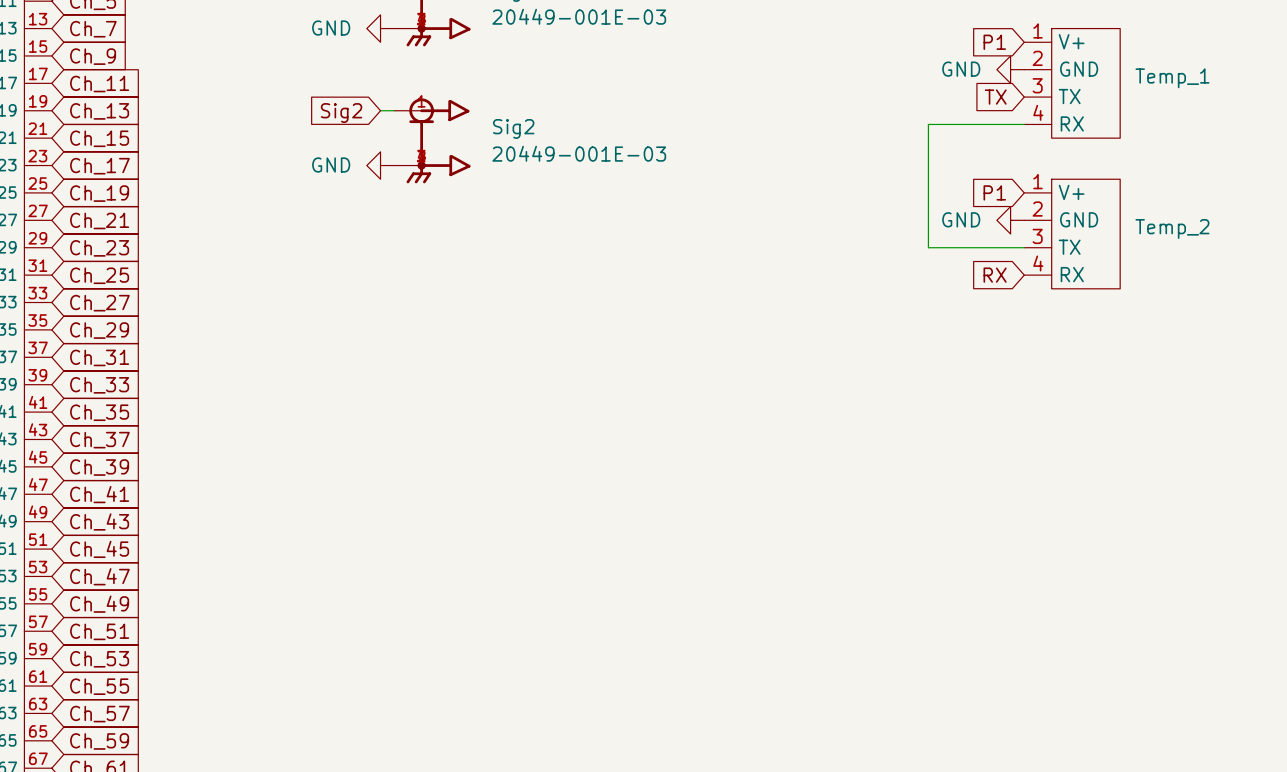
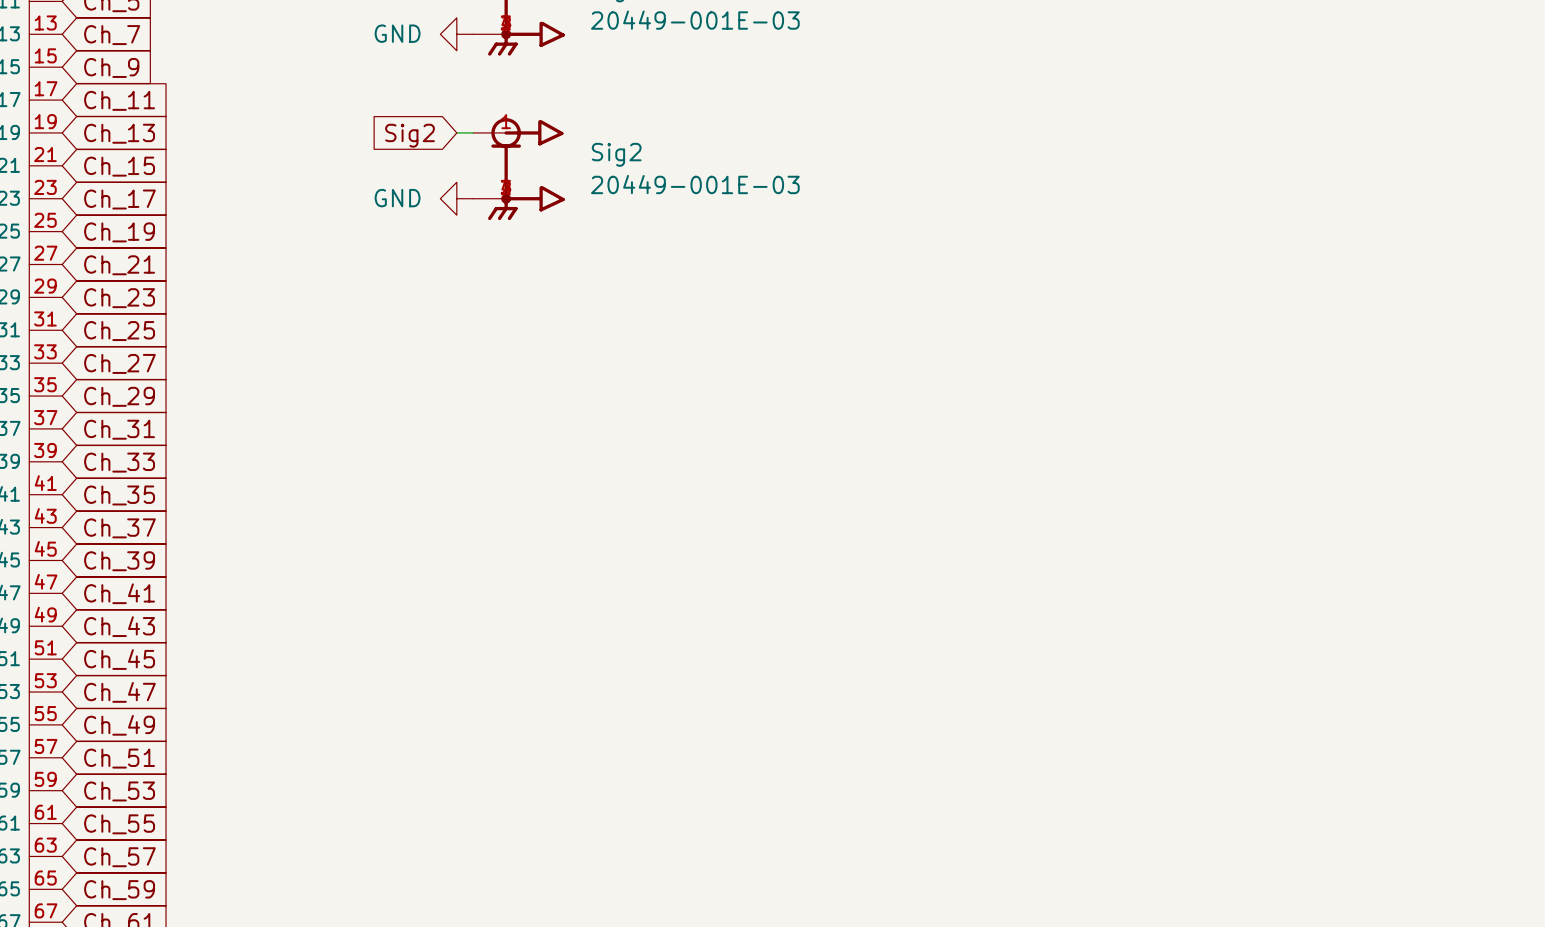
global label: P1 (994, 42) -> none
power symbol: GND (1010, 69) -> none
Temp_1: (1072, 83) -> none
global label: TX (995, 97) -> none
wire: (1024, 124) (928, 124) (928, 247) (1024, 247) -> none
global label: P1 (994, 192) -> none
power symbol: GND (1010, 220) -> none
Temp_2: (1072, 234) -> none
global label: RX (995, 275) -> none

